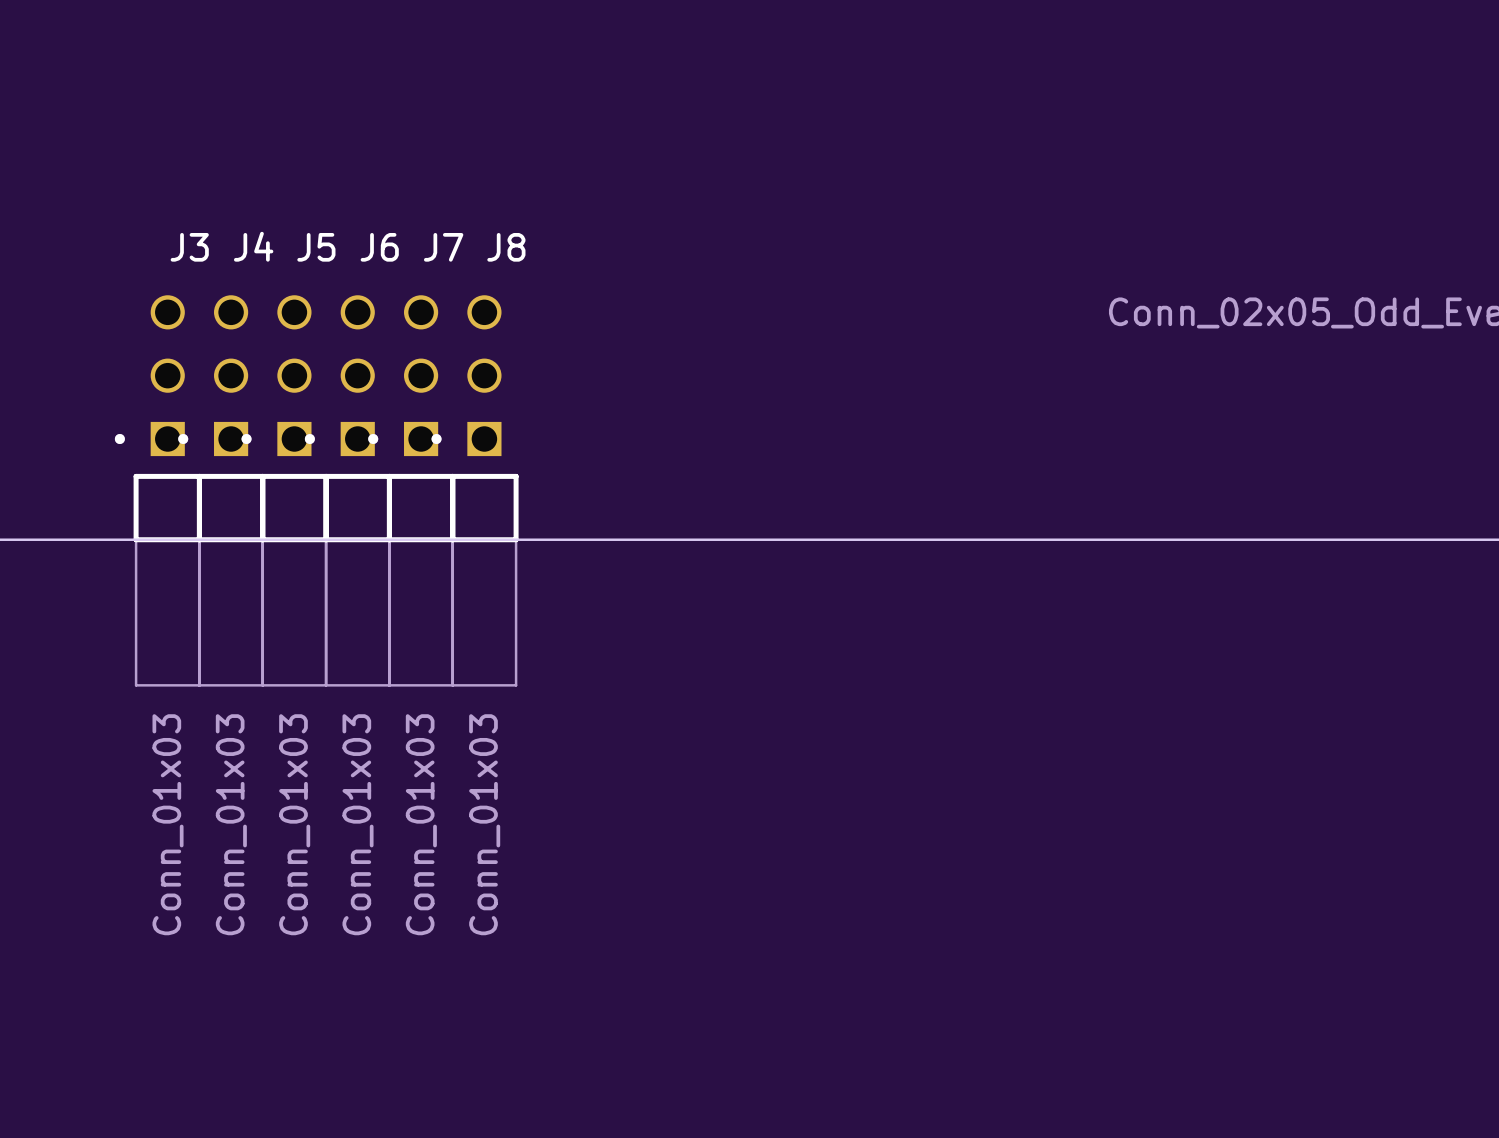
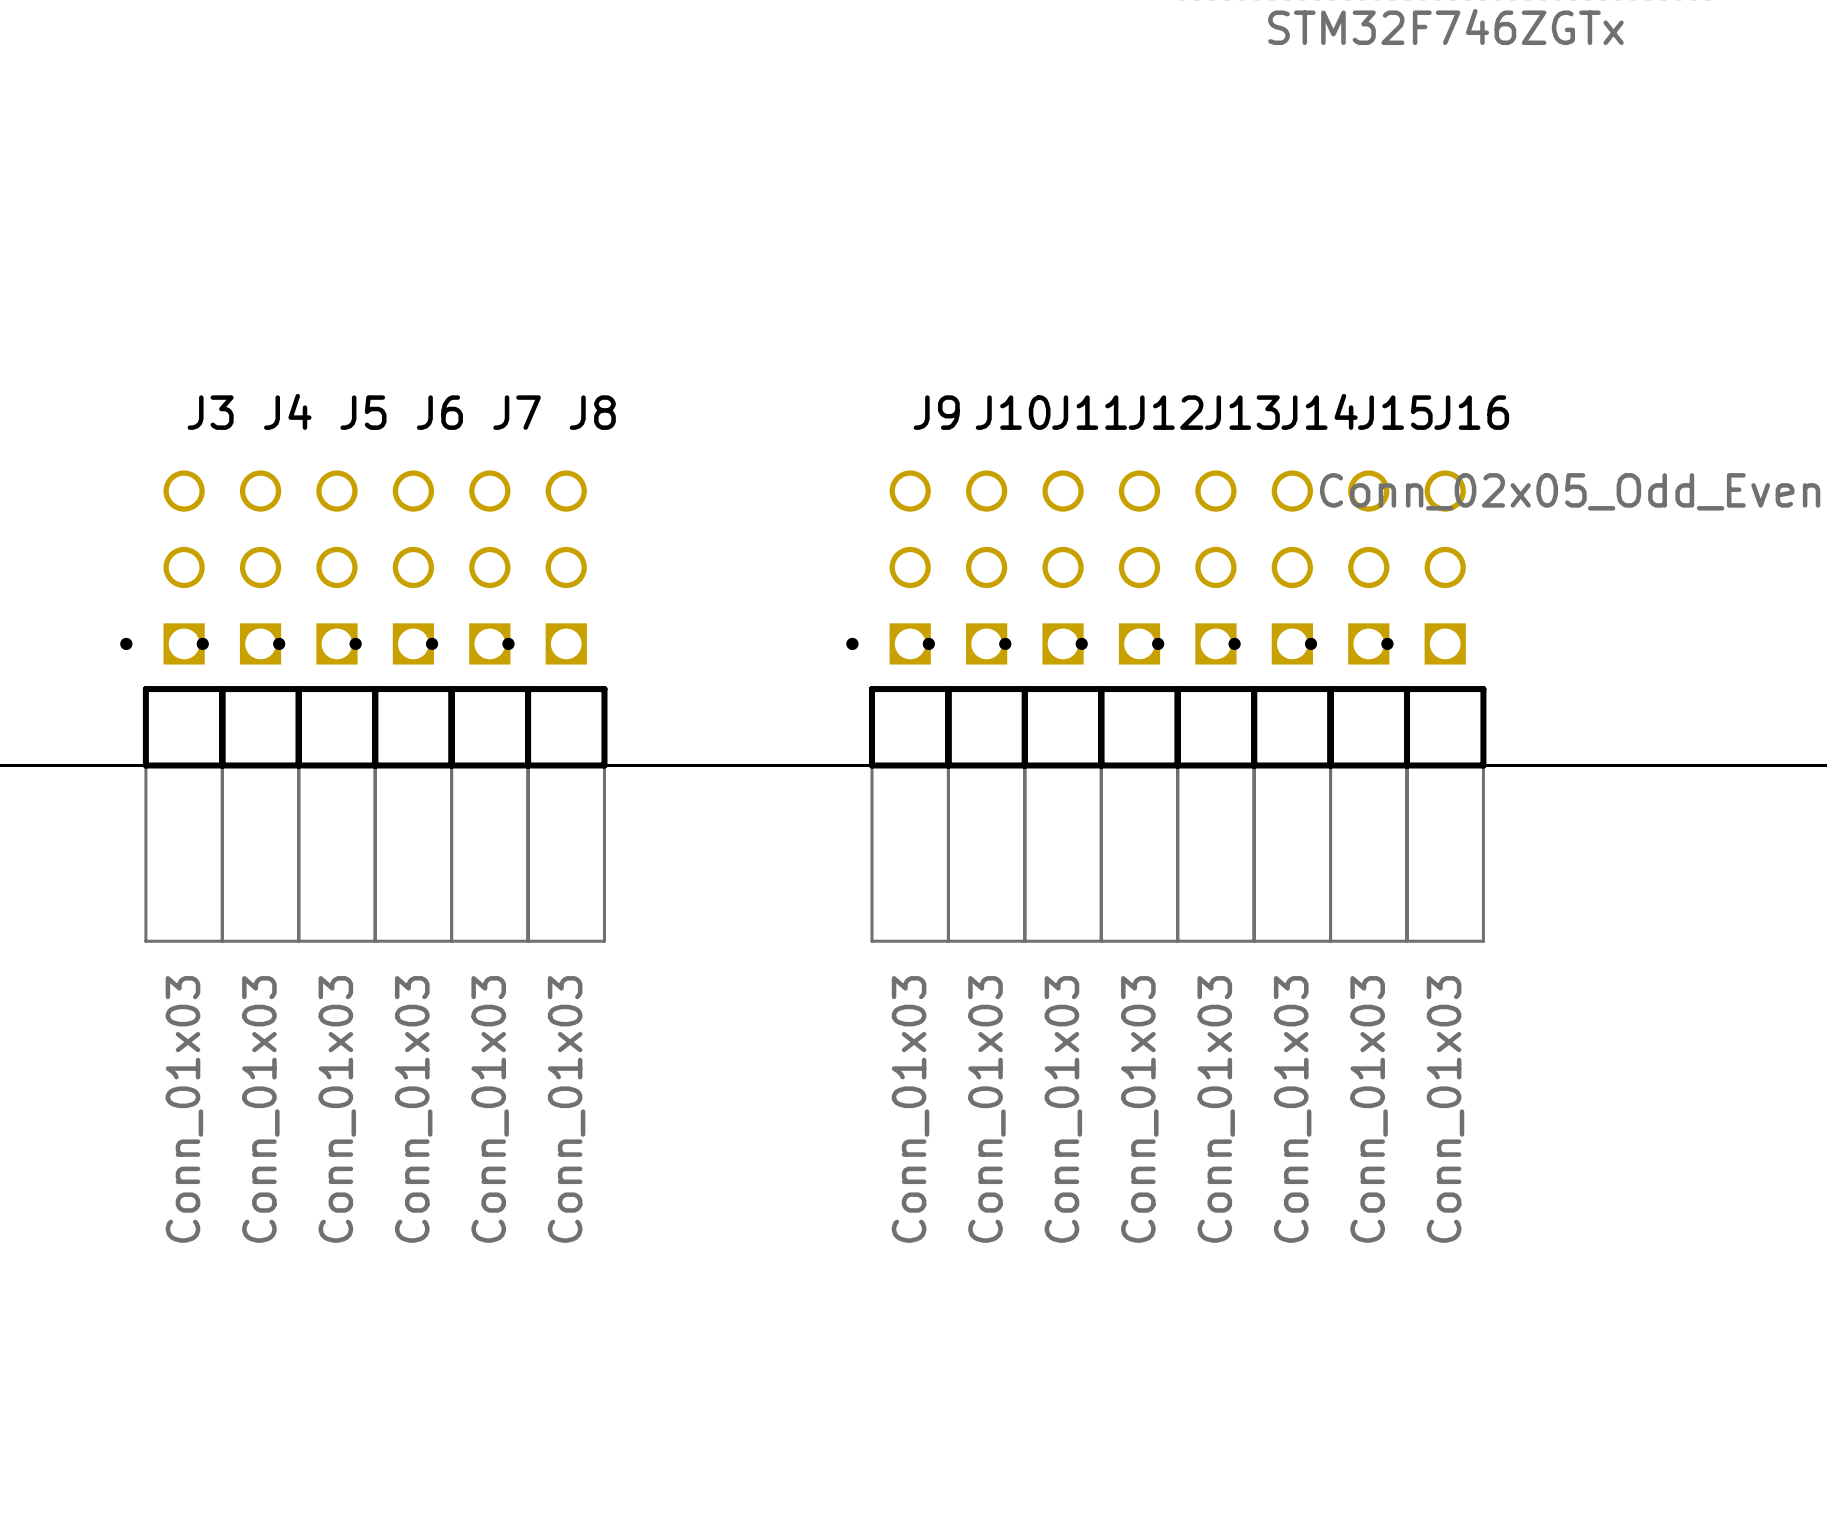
J9: none -> Conn_01x03 (898, 706)
J10: none -> Conn_01x03 (975, 706)
J11: none -> Conn_01x03 (1051, 706)
J12: none -> Conn_01x03 (1128, 706)
J13: none -> Conn_01x03 (1204, 706)
J14: none -> Conn_01x03 (1281, 706)
J15: none -> Conn_01x03 (1357, 706)
J16: none -> Conn_01x03 (1433, 706)

